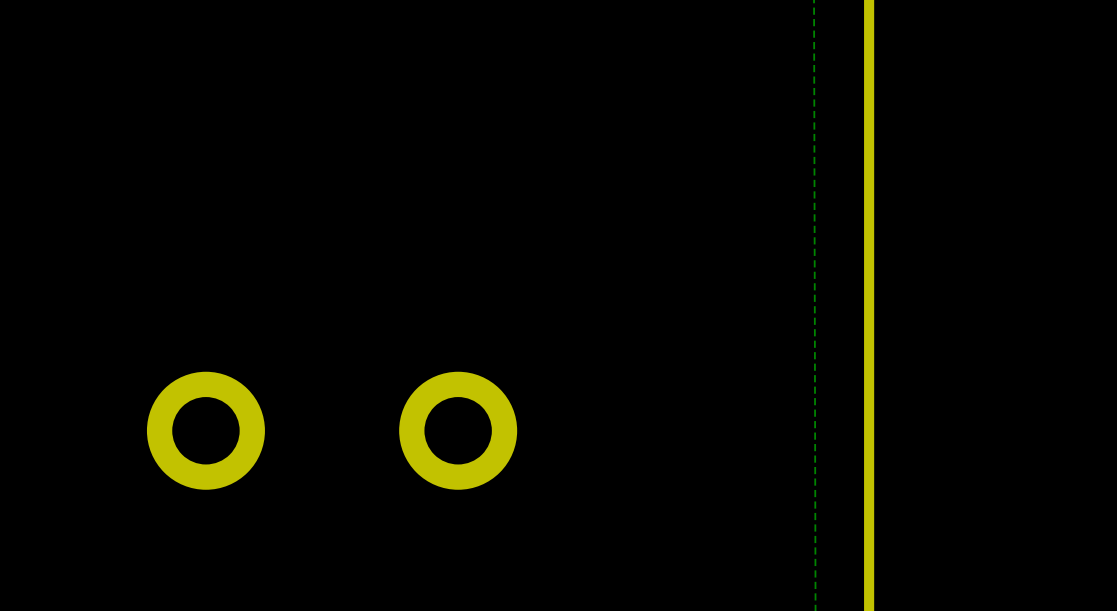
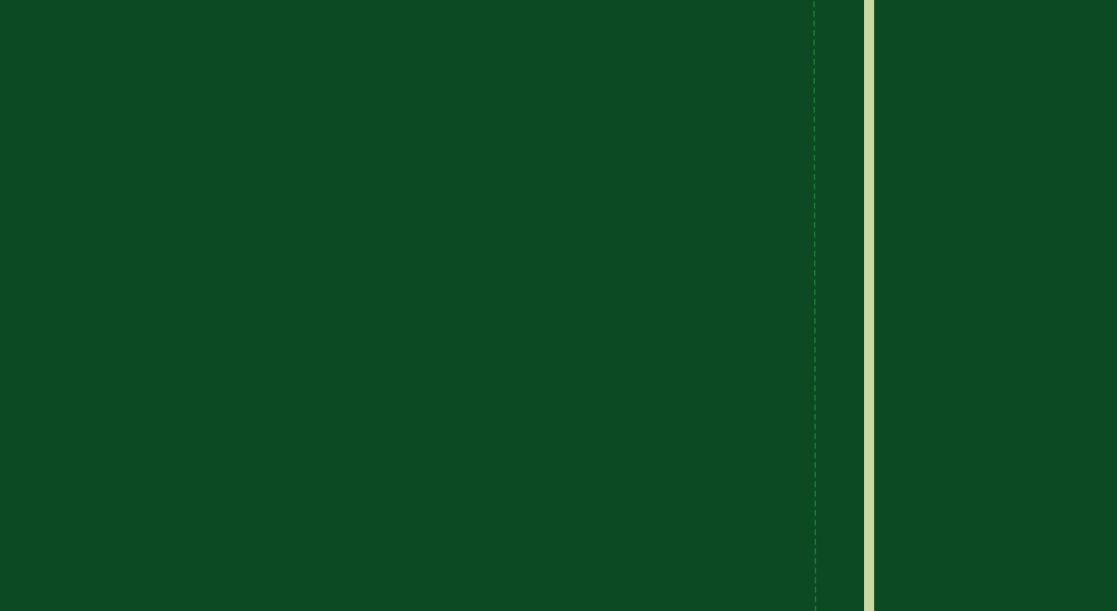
part: (205, 430) -> none
part: (458, 430) -> none

